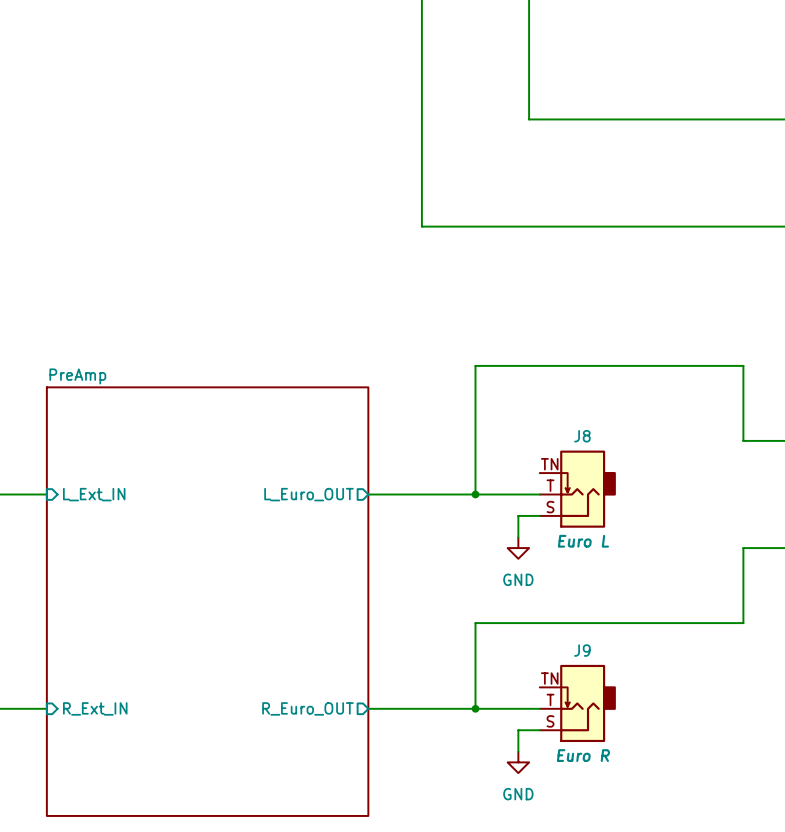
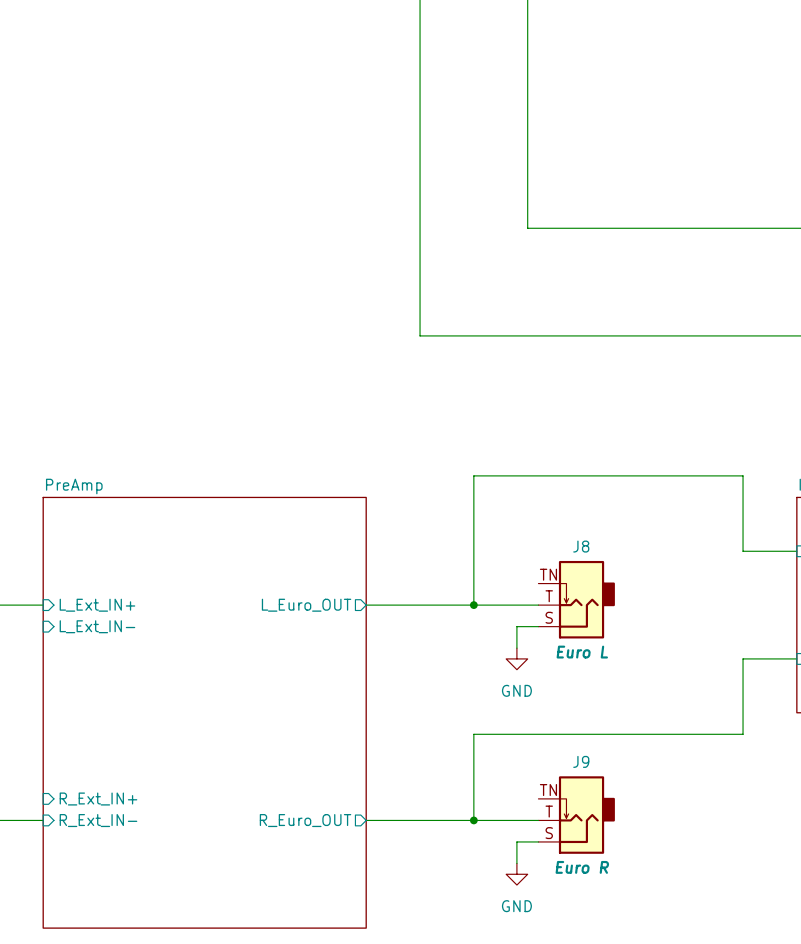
sheet pin: L_Ext_IN (94, 494) -> L_Ext_IN+ (97, 605)
sheet pin: none -> L_Ext_IN- (97, 626)
sheet pin: none -> R_Ext_IN+ (98, 799)
sheet pin: R_Ext_IN (95, 708) -> R_Ext_IN- (98, 820)

